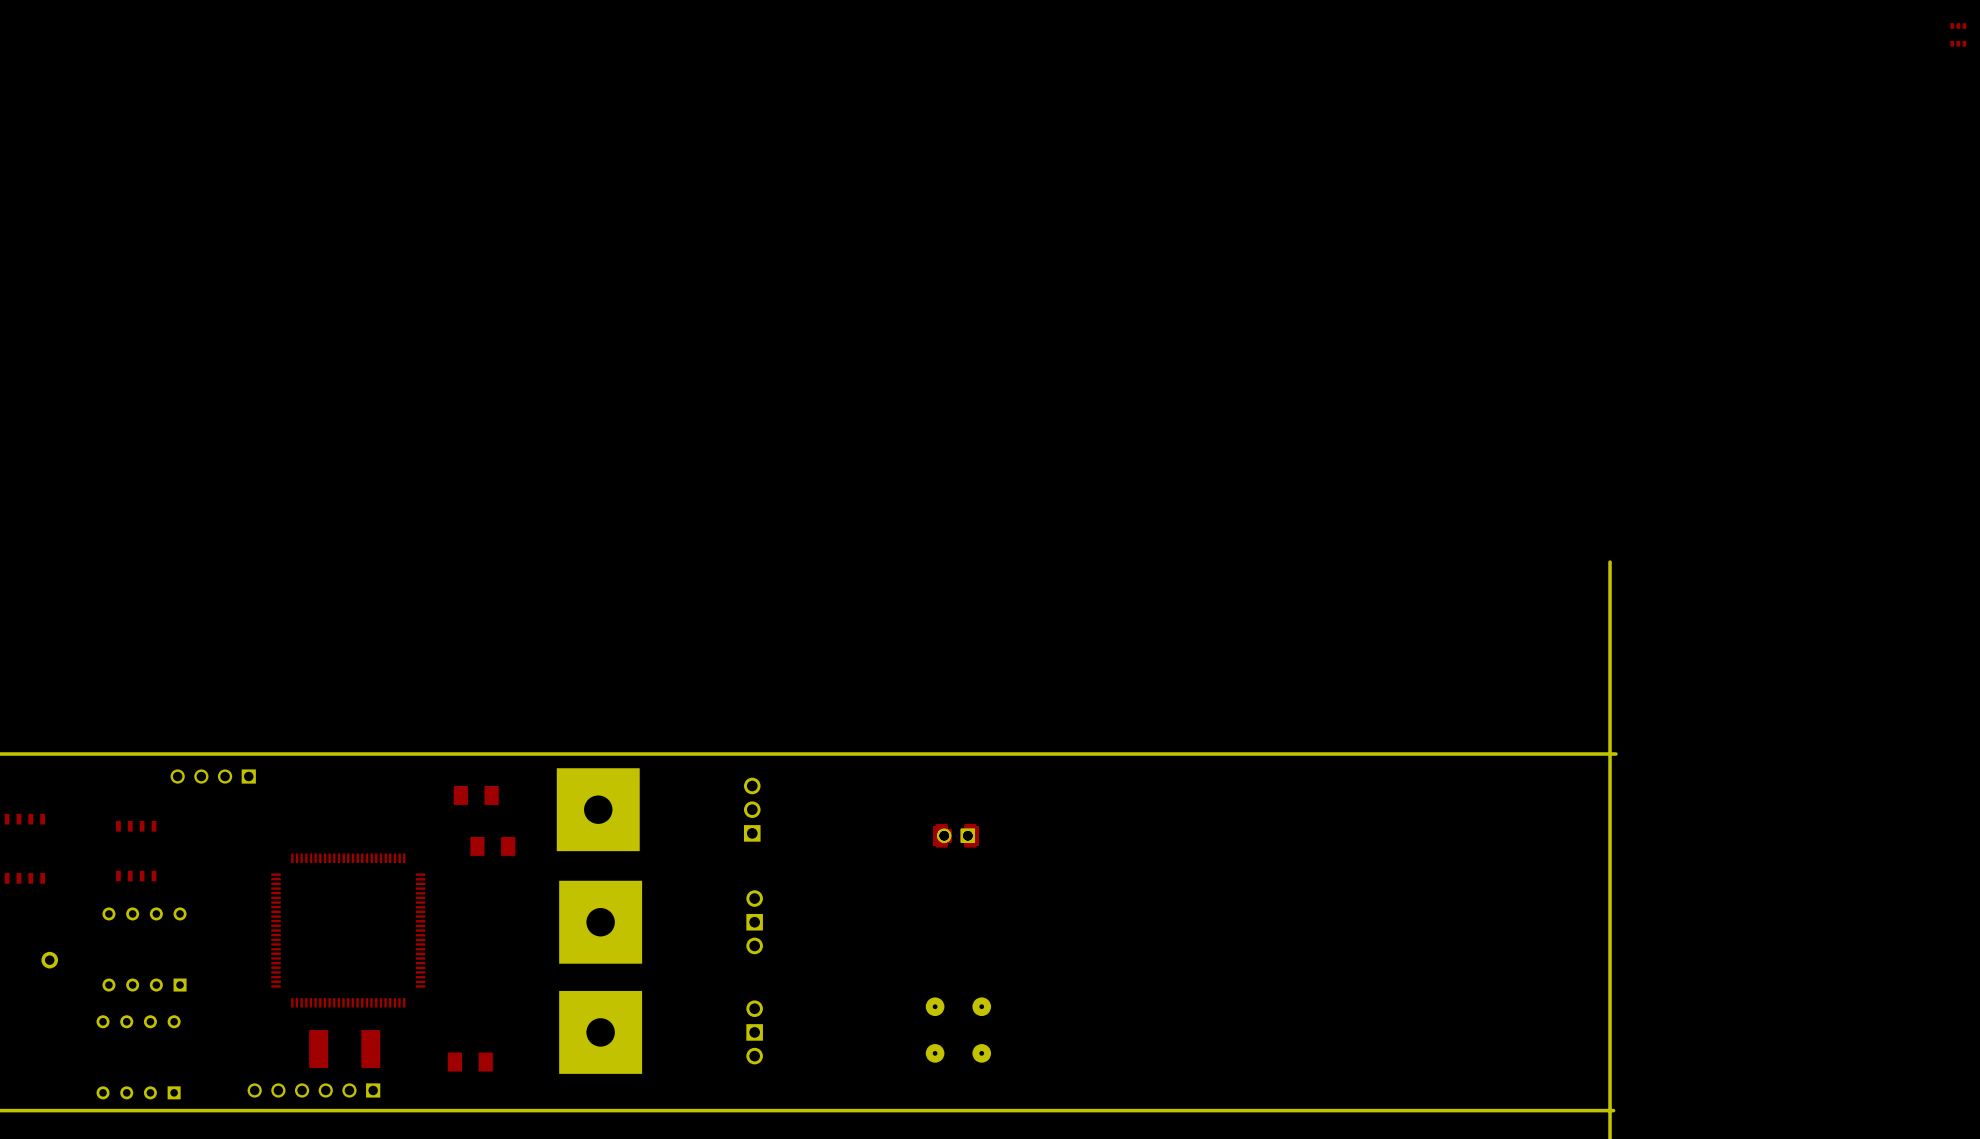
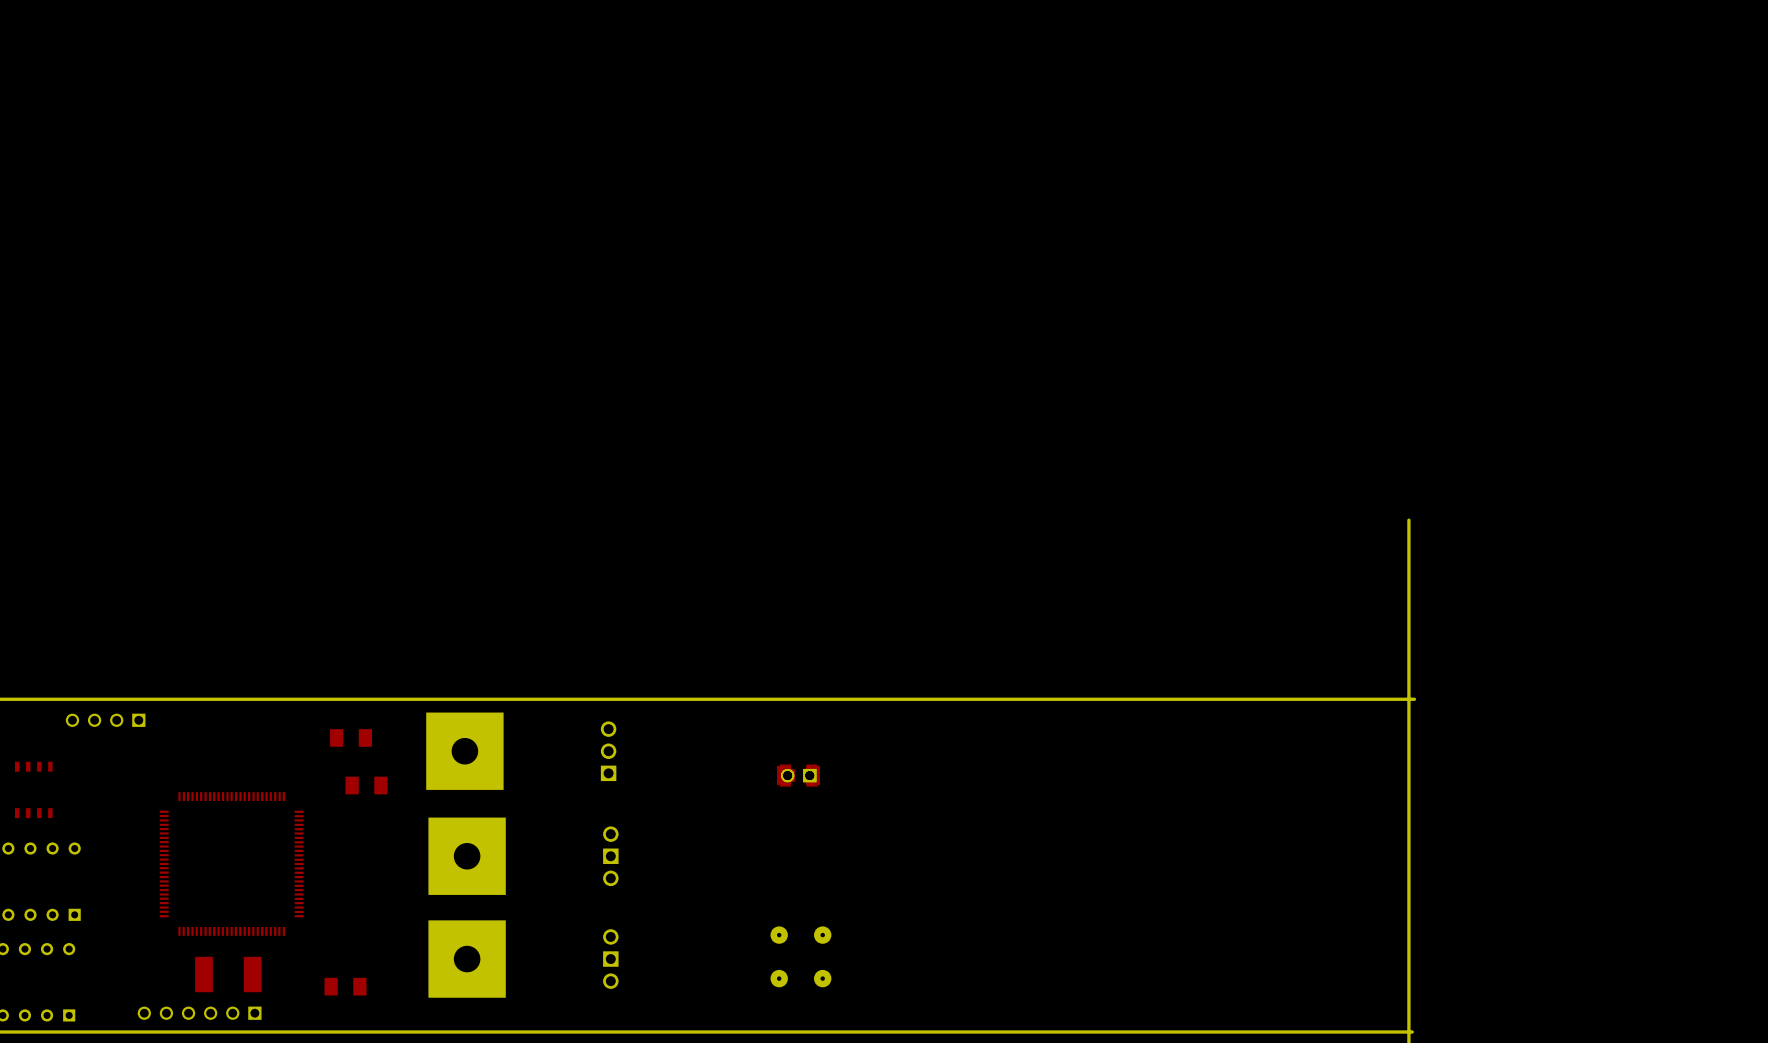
part: (1958, 34) -> none

